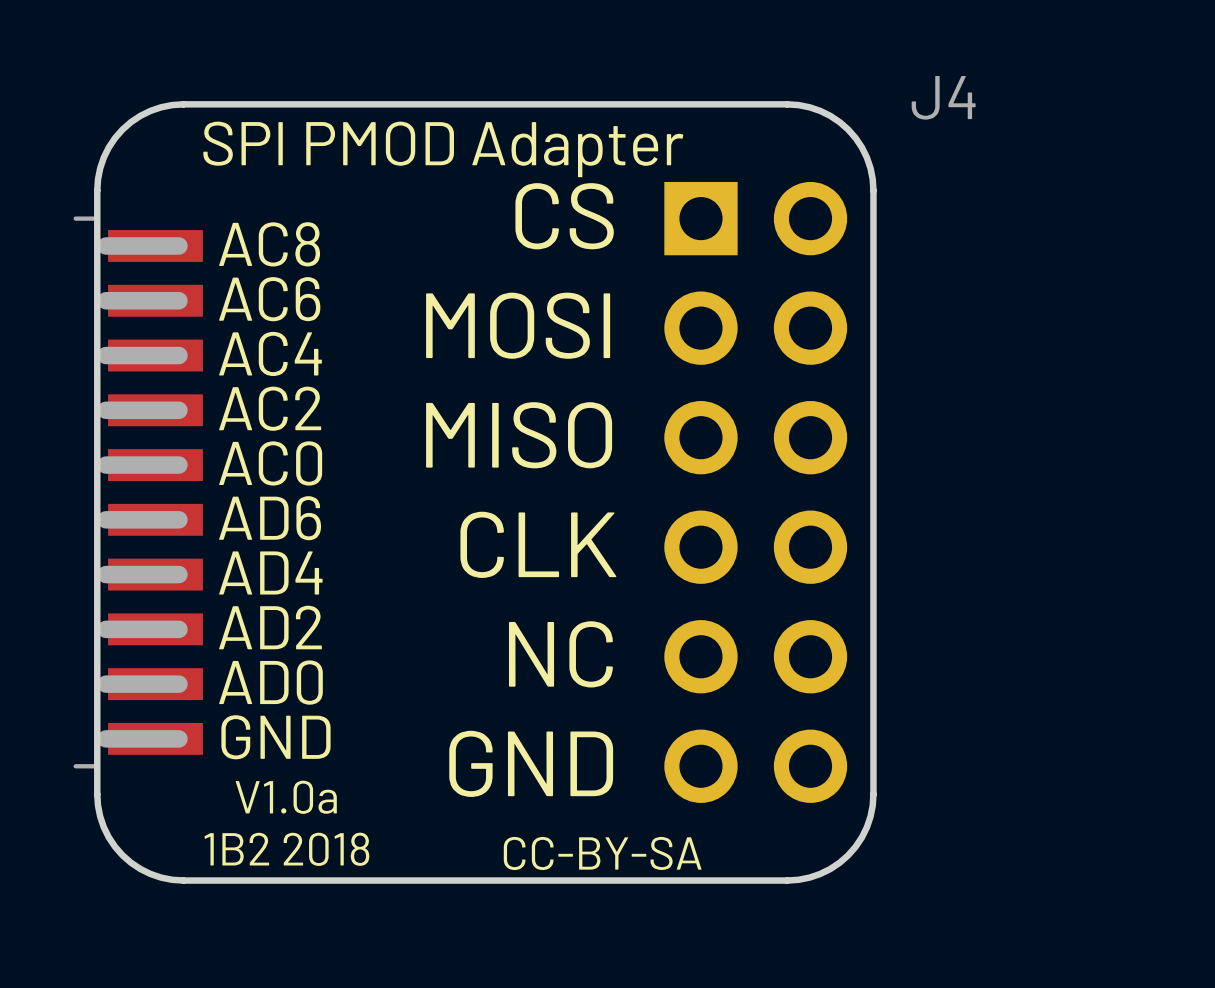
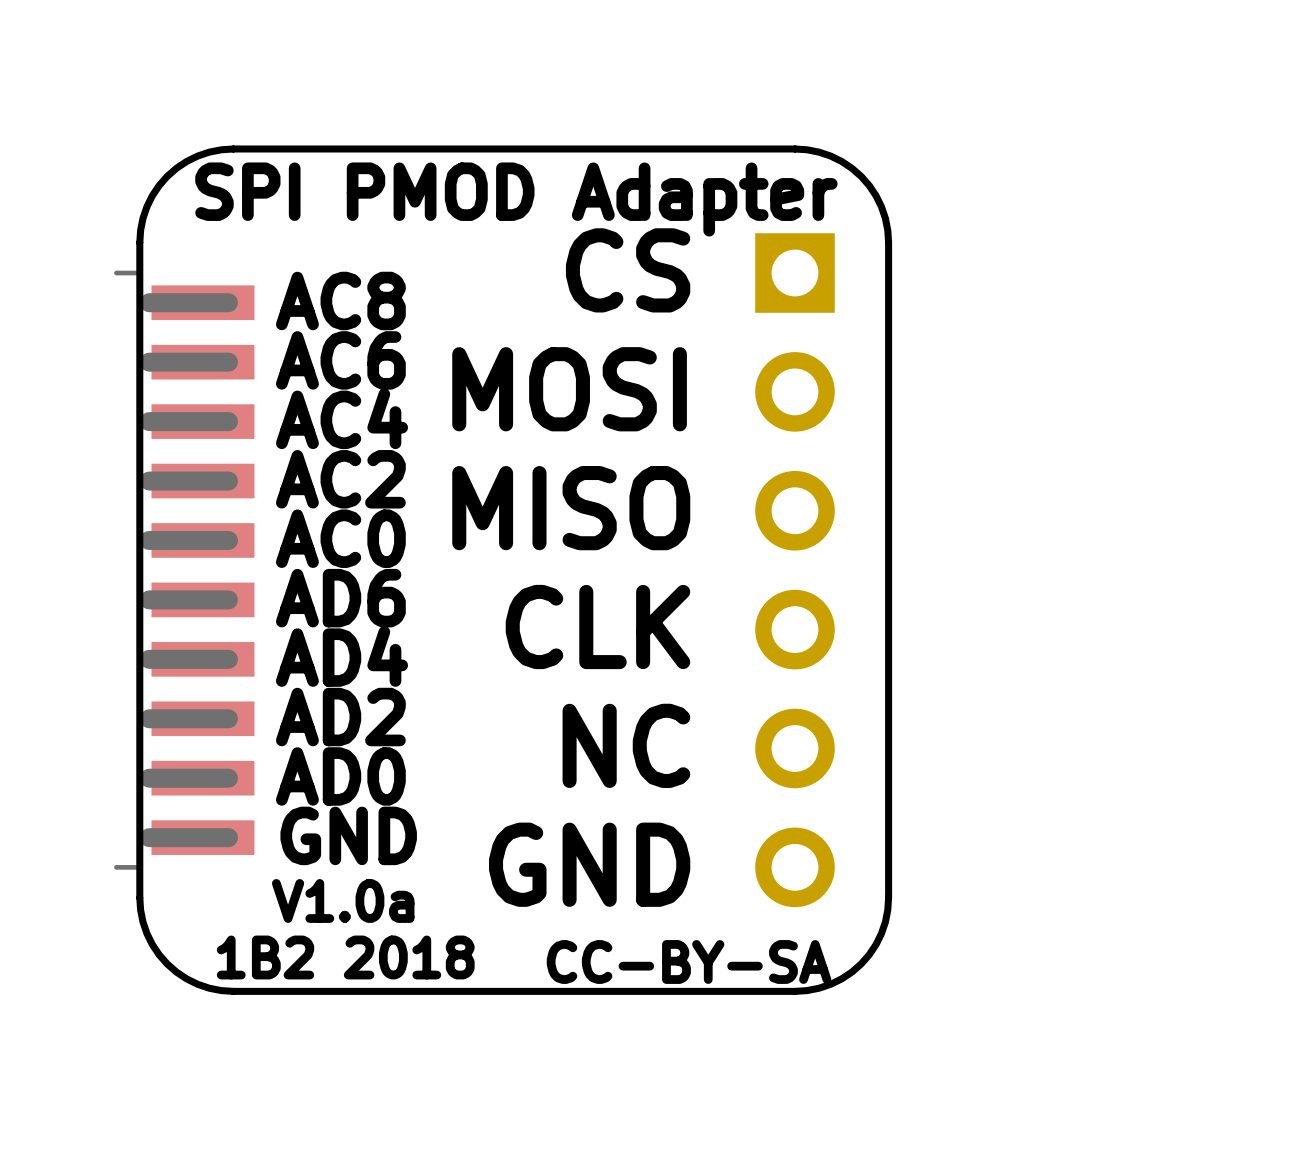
board edge: (700, 104) (798, 105) (830, 115) (848, 129) (861, 147) (870, 168) (873, 190) (873, 794) (870, 816) (855, 846) (839, 862) (820, 873) (787, 880) (700, 880) -> (795, 148) (819, 152) (830, 156) (851, 168) (861, 176) (869, 185) (881, 206) (885, 218) (888, 242) (887, 910) (885, 922) (876, 944) (869, 954) (851, 972) (830, 984) (819, 988) (795, 991)
J4: (755, 492) -> none

